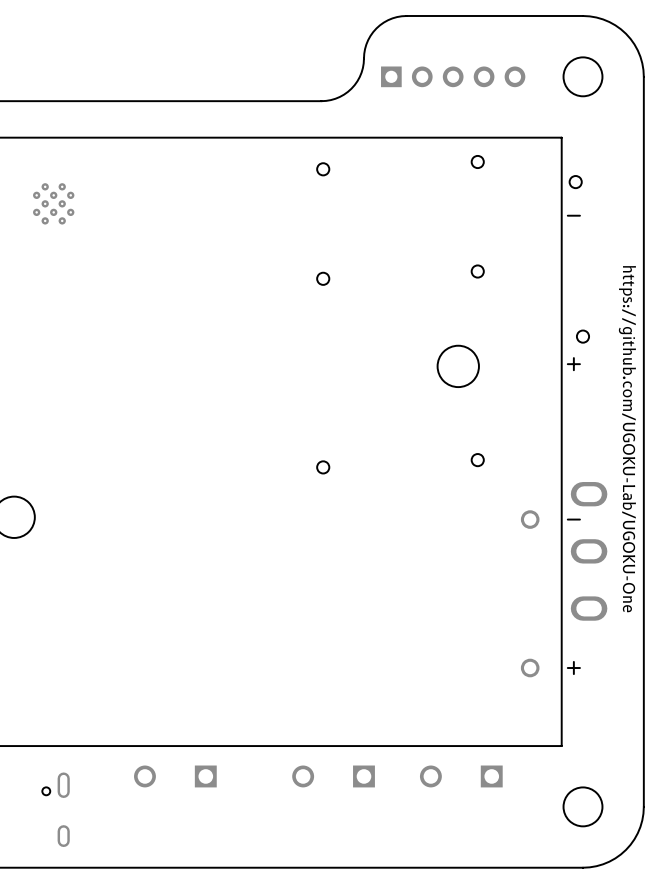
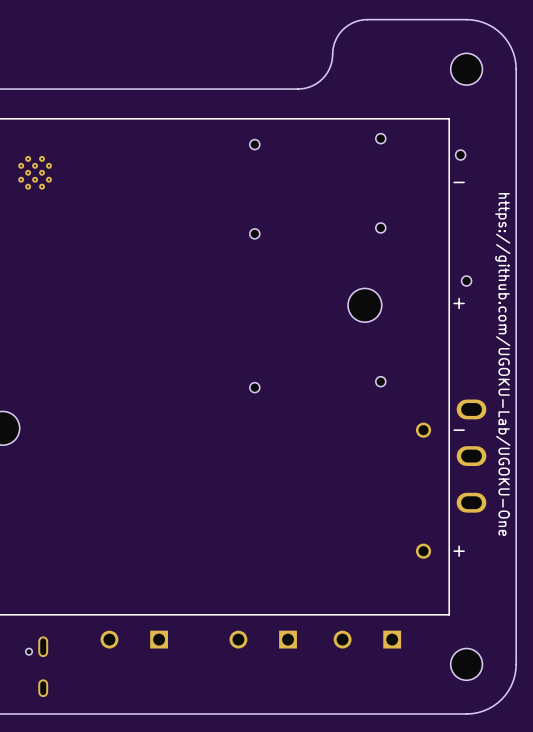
board edge: (461, 15) (401, 16) (383, 22) (373, 32) (368, 40) (361, 72) (354, 85) (339, 96) (321, 101) -> (367, 19) (352, 23) (340, 32) (334, 42) (329, 69) (316, 83) (301, 88) (253, 89)
part: (453, 76) -> none

